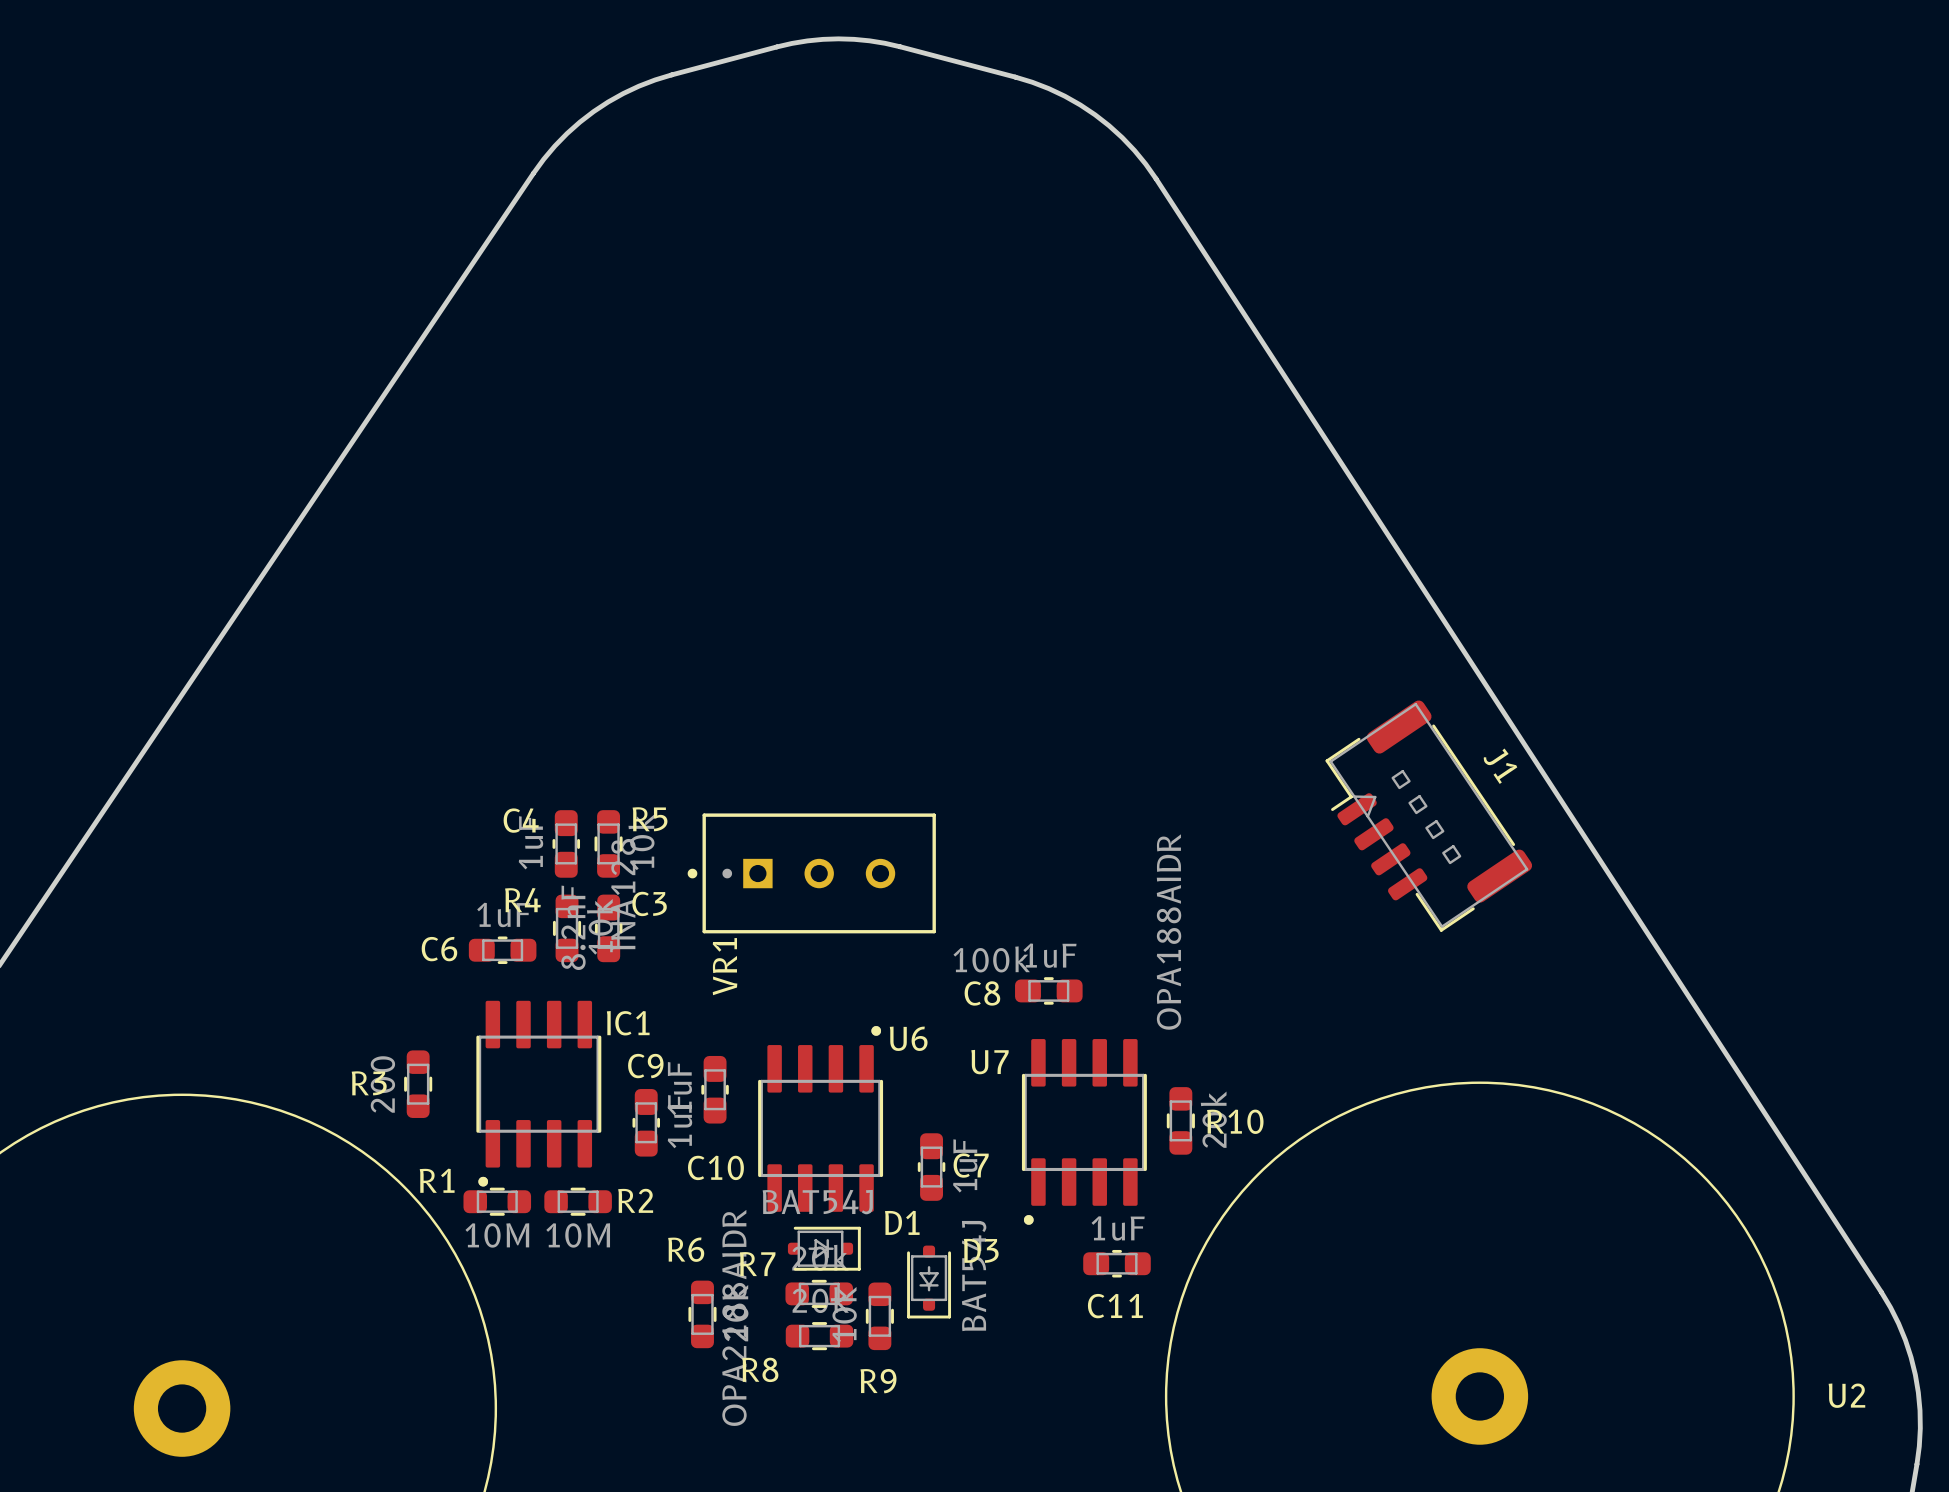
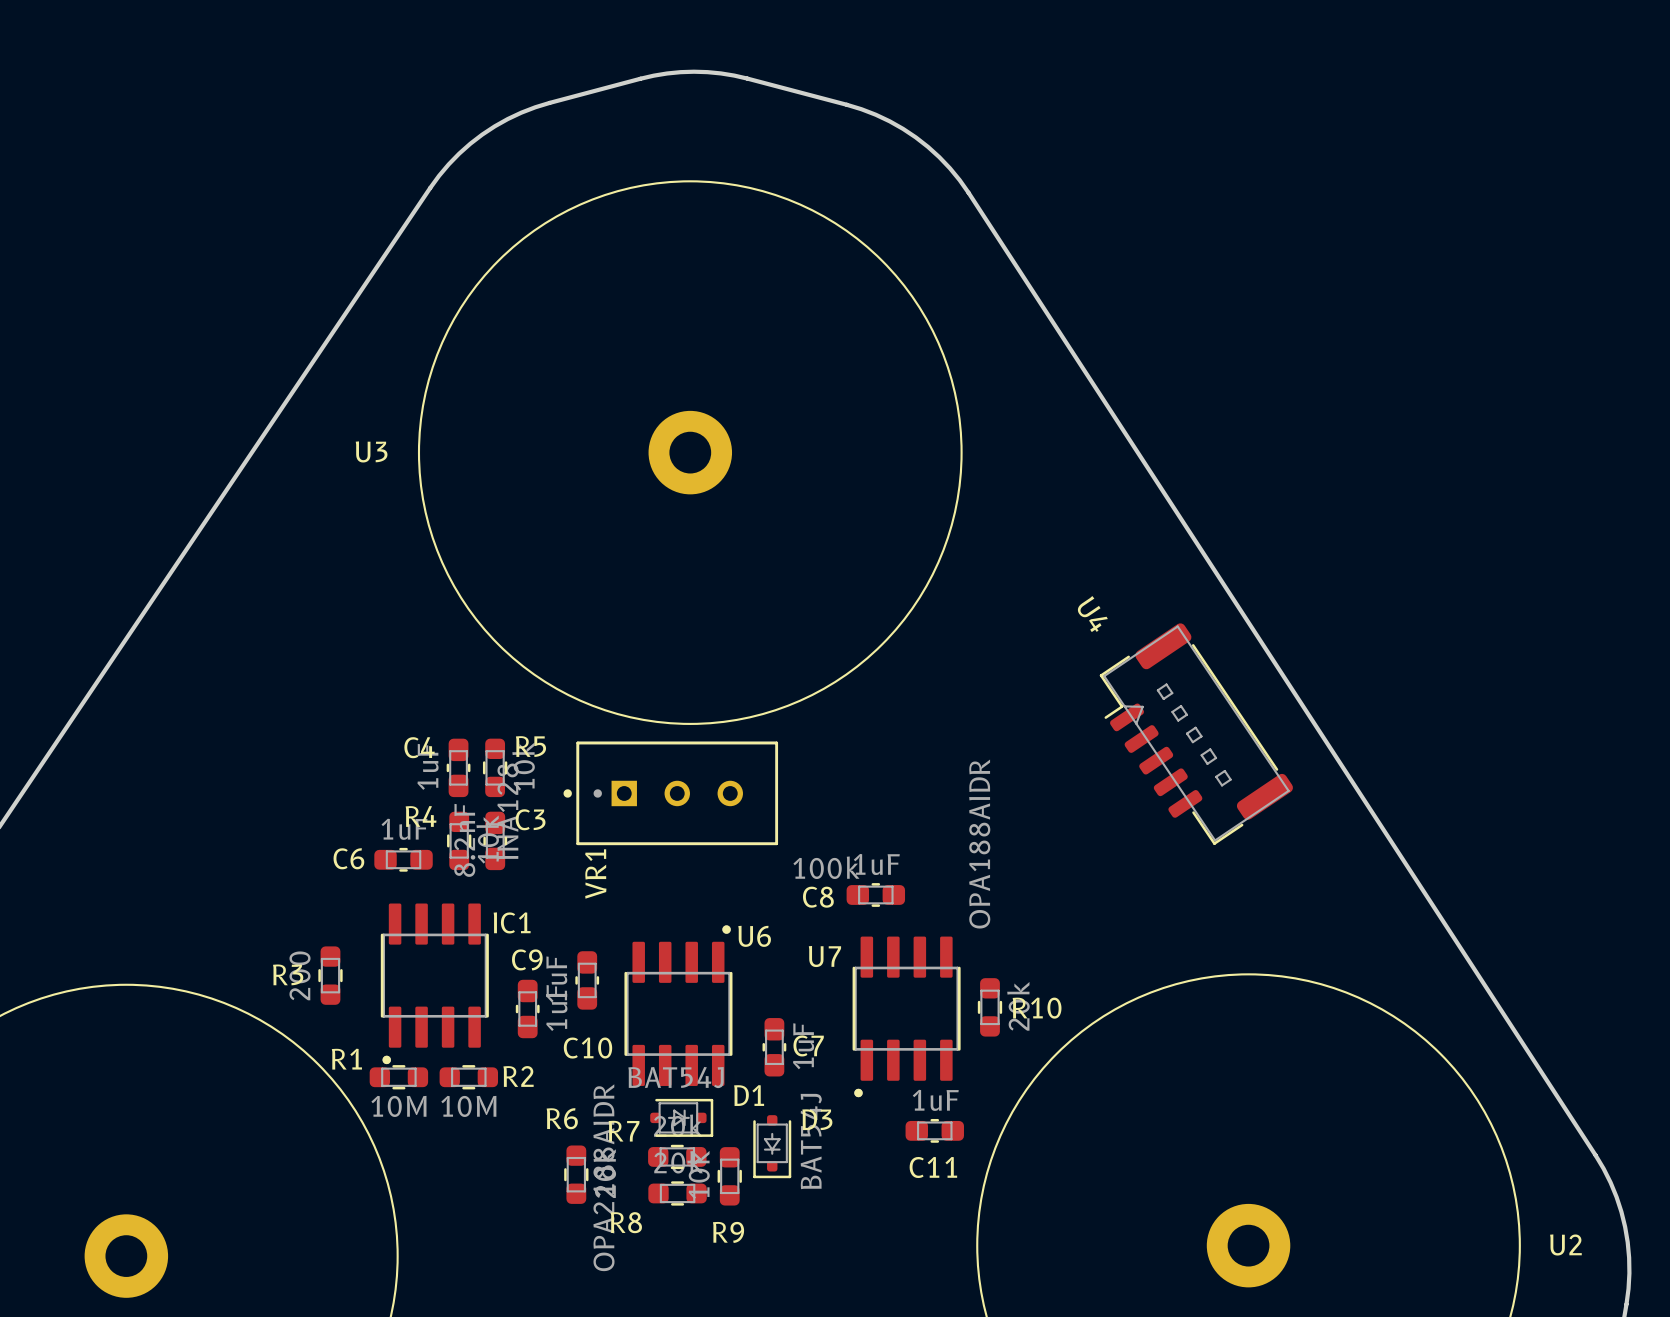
U3: none -> (690, 452)
U4: none -> (1196, 734)
J1: (1428, 816) -> none

